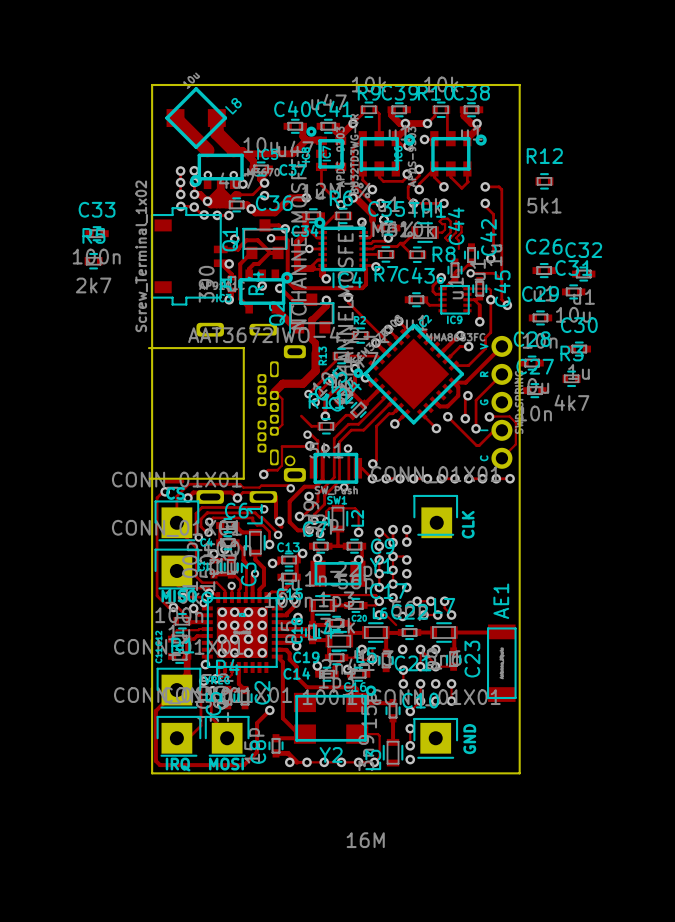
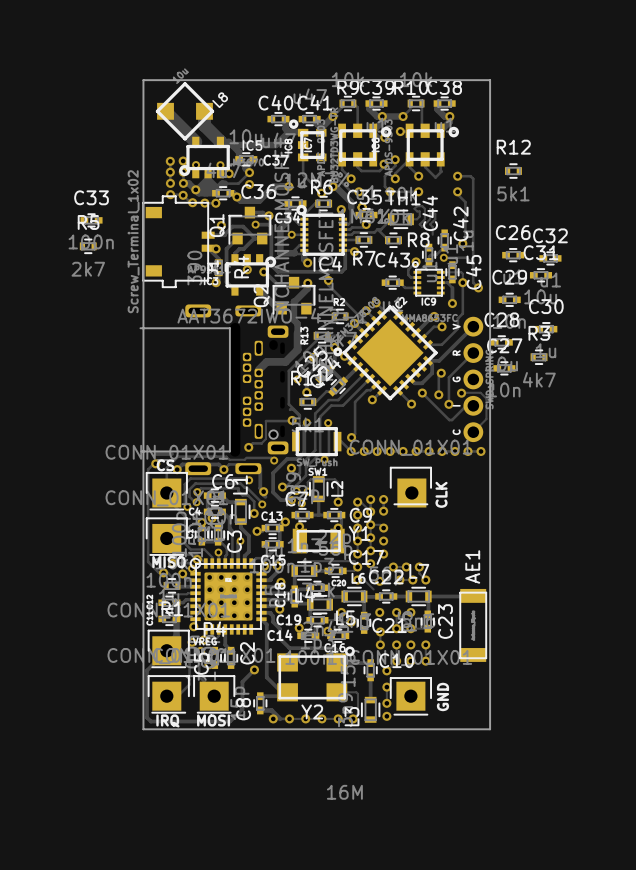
track: (322, 376) (322, 379) (308, 394) -> (304, 355) (288, 370) (288, 404) (299, 416)
via: (308, 394) -> none
track: (274, 395) (278, 395) (282, 399) (282, 424) (274, 431) -> none
track: (301, 416) (311, 426) (320, 426) -> none
via: (307, 434) -> none

